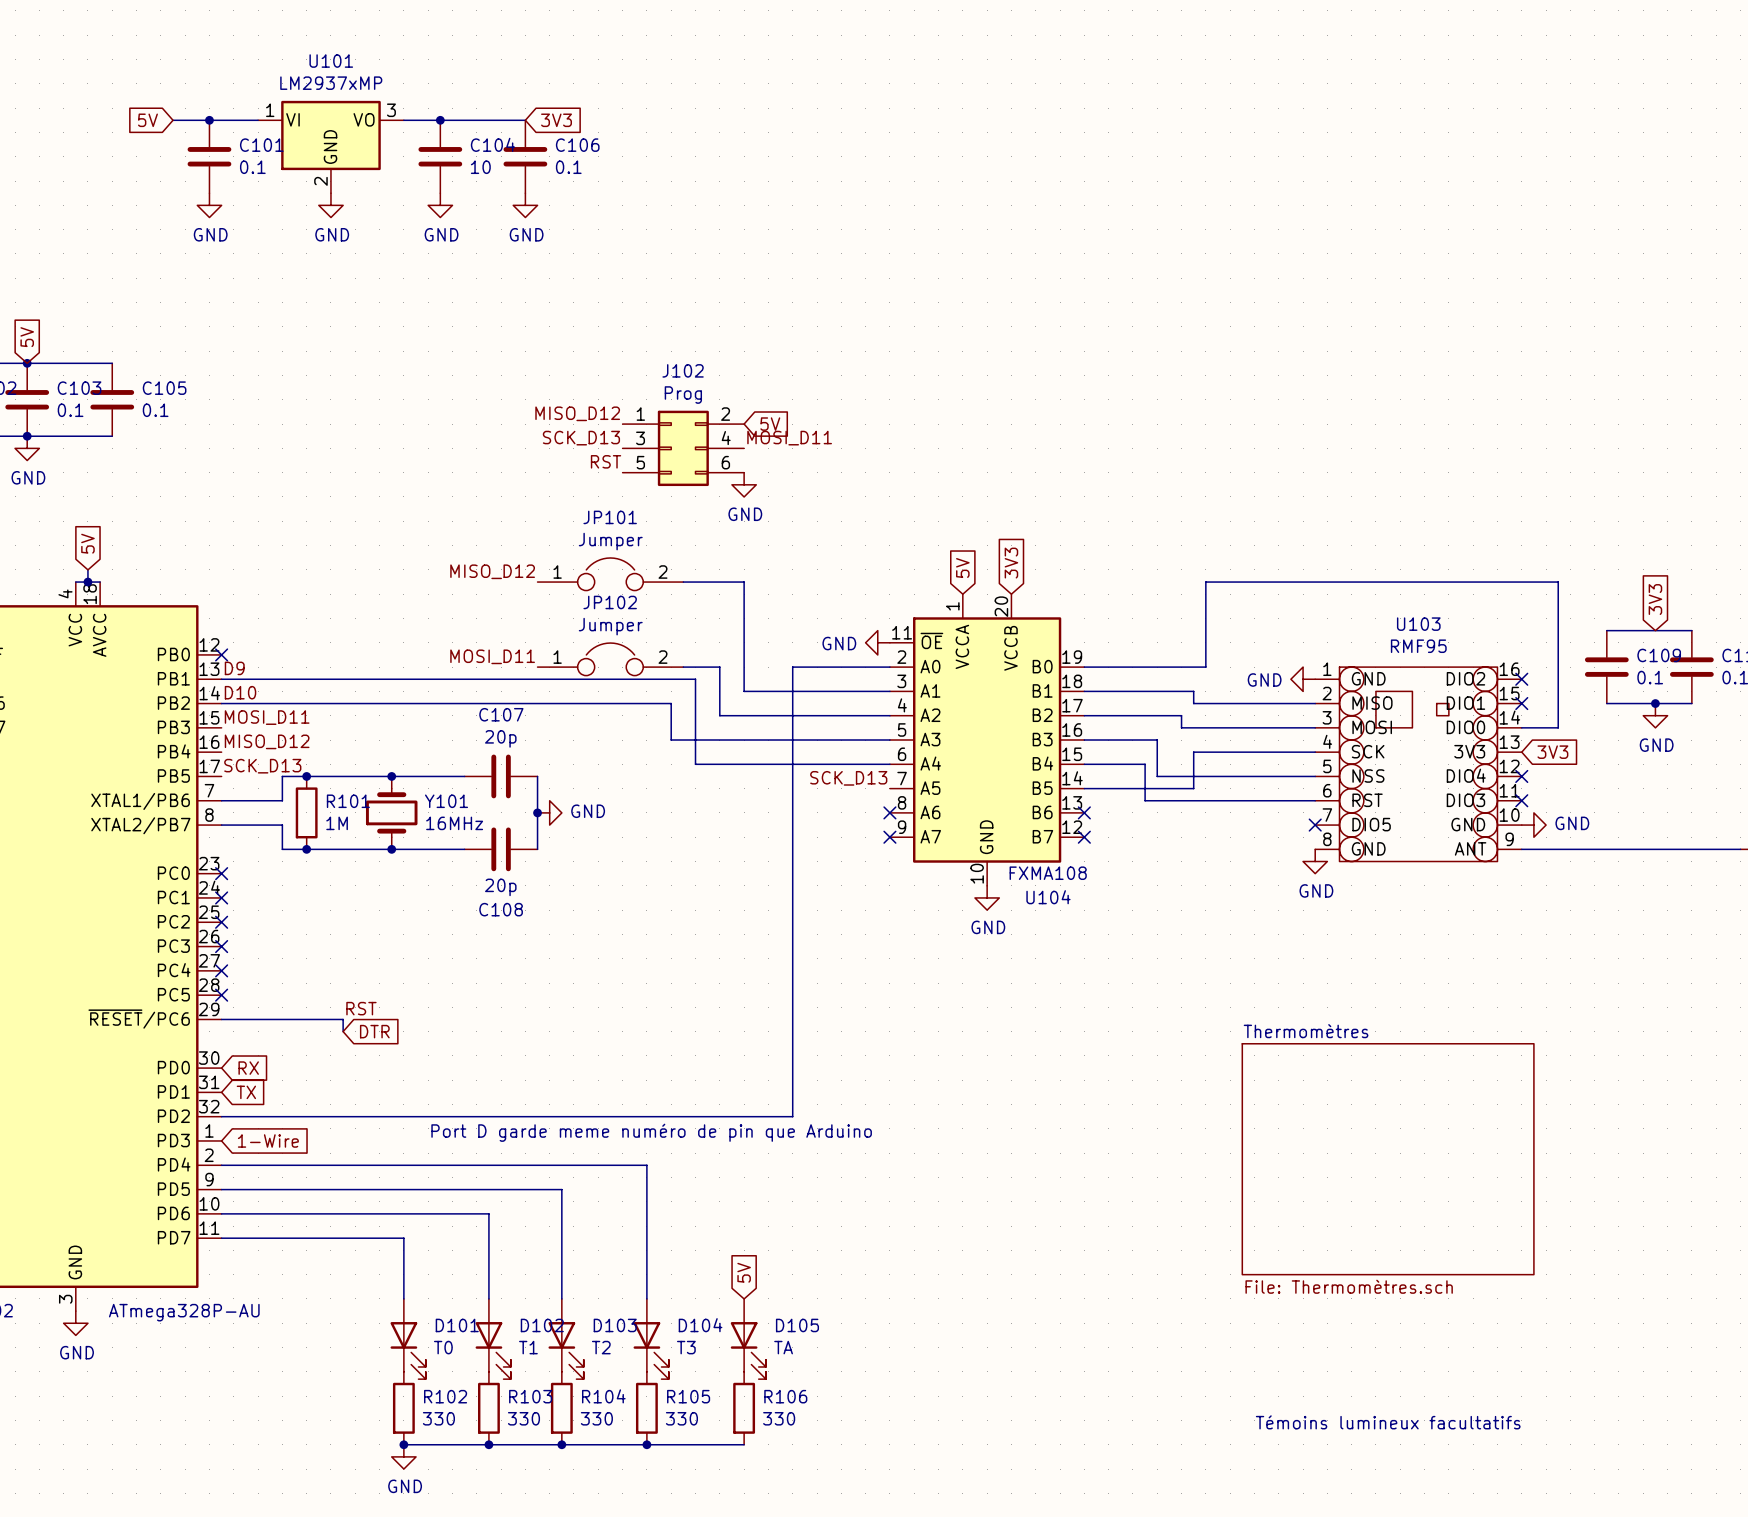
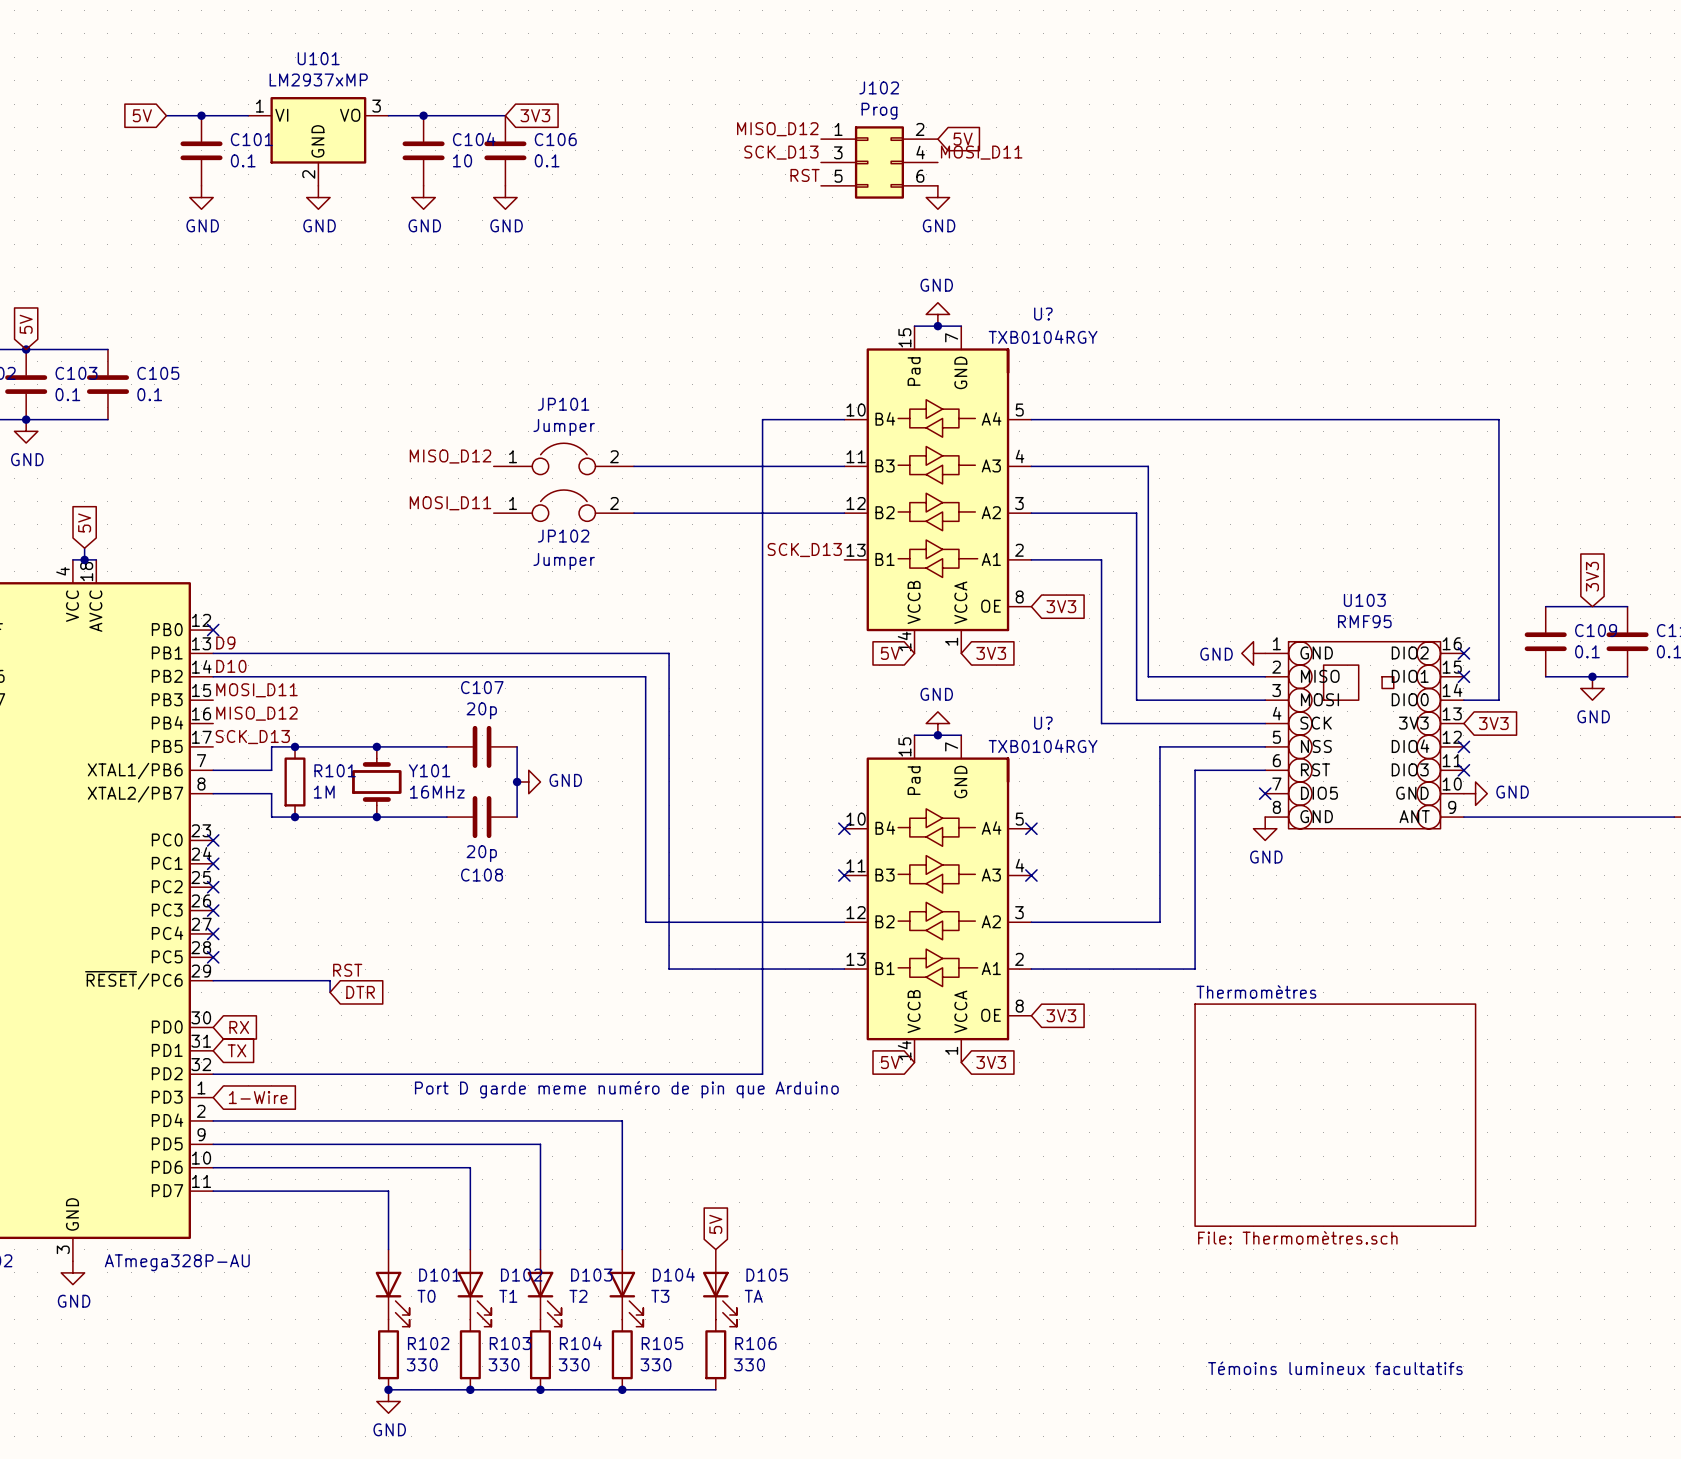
label: none -> MISO_D12 (777, 129)
global label: none -> 5V (963, 139)
label: none -> SCK_D13 (781, 152)
label: none -> MOSI_D11 (981, 152)
label: none -> RST (805, 175)
power symbol: none -> GND (937, 197)
power symbol: none -> GND (937, 314)
wire: none -> (914, 326) (961, 326)
junction: none -> (937, 326)
label: MISO_D12 (577, 413) -> none
global label: 5V (770, 424) -> none
label: SCK_D13 (581, 438) -> none
label: MOSI_D11 (789, 438) -> none
J102 position: (683, 448) -> (879, 162)
label: RST (606, 461) -> none
label: none -> MISO_D12 (450, 456)
wire: none -> (633, 466) (844, 466)
power symbol: GND (744, 484) -> none
U?: none -> TXB0104RGY (937, 489)
label: none -> MOSI_D11 (450, 503)
wire: none -> (633, 513) (844, 513)
global label: 3V3 (1011, 563) -> none
global label rotation: 0° (962, 567) -> 90° counterclockwise (890, 653)
global label position: 5V (962, 567) -> 5V (890, 653)
label: MISO_D12 (492, 571) -> none
label: none -> SCK_D13 (804, 550)
JP101 position: (610, 574) -> (563, 458)
wire: (683, 582) (744, 582) (744, 691) (889, 691) -> none
wire: (1558, 582) (1205, 582) (1205, 667) (1084, 667) -> (1498, 559) (1498, 419) (1031, 419)
JP102 name position: JP102 (610, 602) -> JP102 (563, 536)
JP102 value position: Jumper (610, 626) -> Jumper (564, 561)
global label: none -> 3V3 (1061, 606)
power symbol: GND (877, 642) -> none
label: MOSI_D11 (492, 656) -> none
JP102 position: (610, 659) -> (563, 505)
wire: (683, 667) (719, 667) (719, 715) (889, 715) -> none
wire: (792, 667) (889, 667) -> (762, 641) (762, 419) (844, 419)
global label: none -> 3V3 (991, 653)
wire: (1084, 691) (1193, 691) -> (1031, 466) (1148, 466) (1148, 665)
wire: (1084, 715) (1181, 715) -> (1031, 513) (1136, 513) (1136, 688)
wire: (671, 740) (889, 740) -> (645, 711) (645, 922) (844, 922)
U104: FXMA108 (987, 740) -> none
wire: (1084, 740) (1157, 740) (1157, 776) (1205, 776) -> (1031, 922) (1159, 922) (1159, 746)
power symbol: none -> GND (937, 723)
wire: (1193, 752) (1193, 788) (1084, 788) -> (1148, 723) (1101, 723) (1101, 559) (1031, 559)
wire: (695, 764) (889, 764) -> (669, 735) (669, 969) (844, 969)
junction: none -> (937, 735)
wire: (1084, 764) (1145, 764) (1145, 800) (1242, 800) -> (1031, 969) (1195, 969) (1195, 770)
label: SCK_D13 (848, 778) -> none
no-connect mark: (889, 812) -> none
no-connect mark: (1084, 812) -> none
no-connect mark: (889, 837) -> none
no-connect mark: (1084, 837) -> none
no-connect mark: none -> (844, 828)
no-connect mark: none -> (1031, 828)
power symbol: GND (987, 897) -> none
no-connect mark: none -> (844, 875)
no-connect mark: none -> (1031, 875)
U?: none -> TXB0104RGY (937, 898)
global label: none -> 3V3 (1061, 1015)
global label: none -> 5V (890, 1062)
global label: none -> 3V3 (991, 1062)

